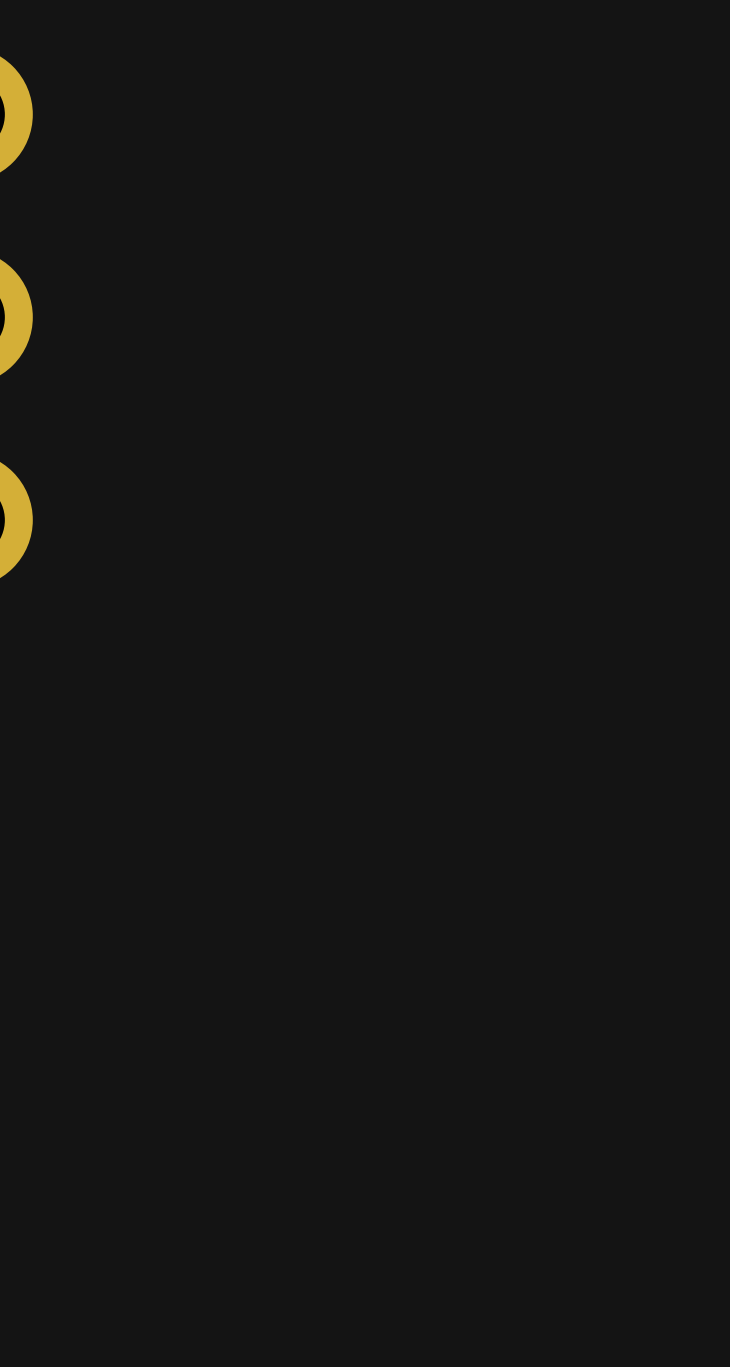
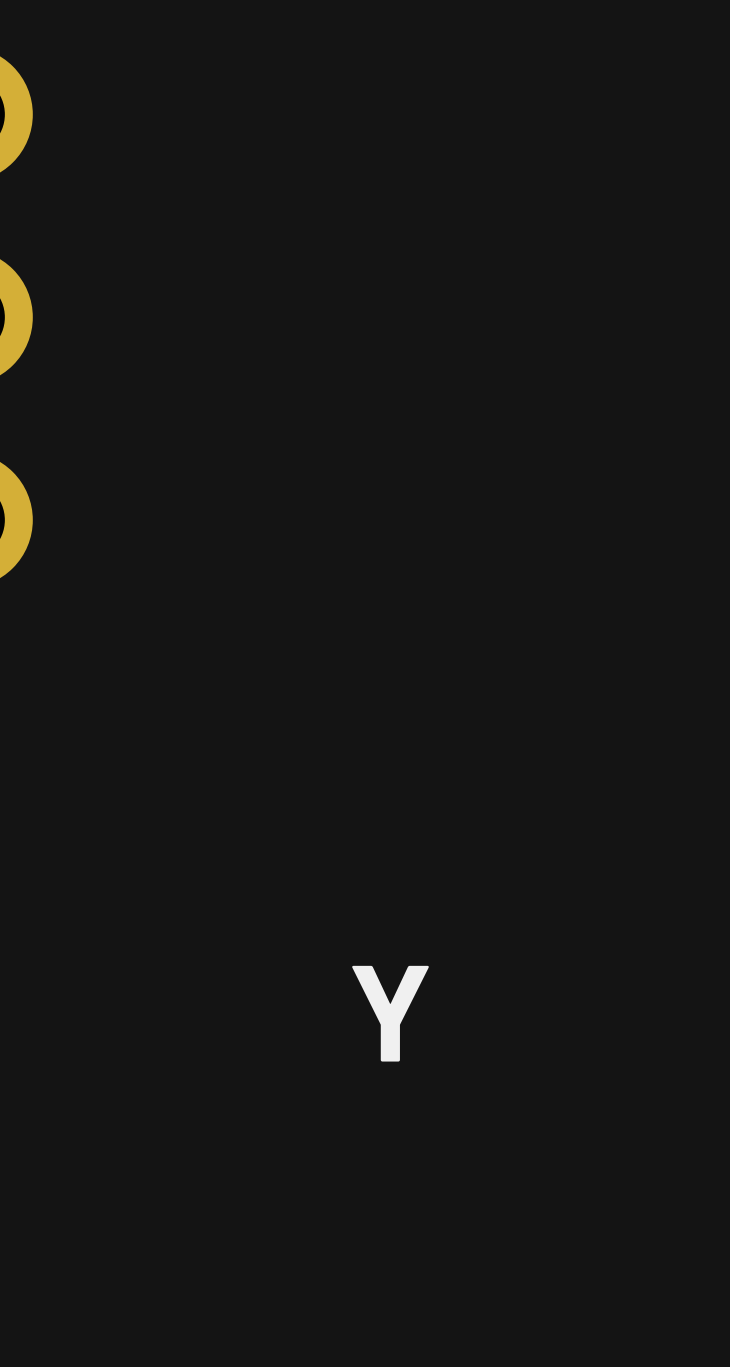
text: none -> Y (390, 1013)

